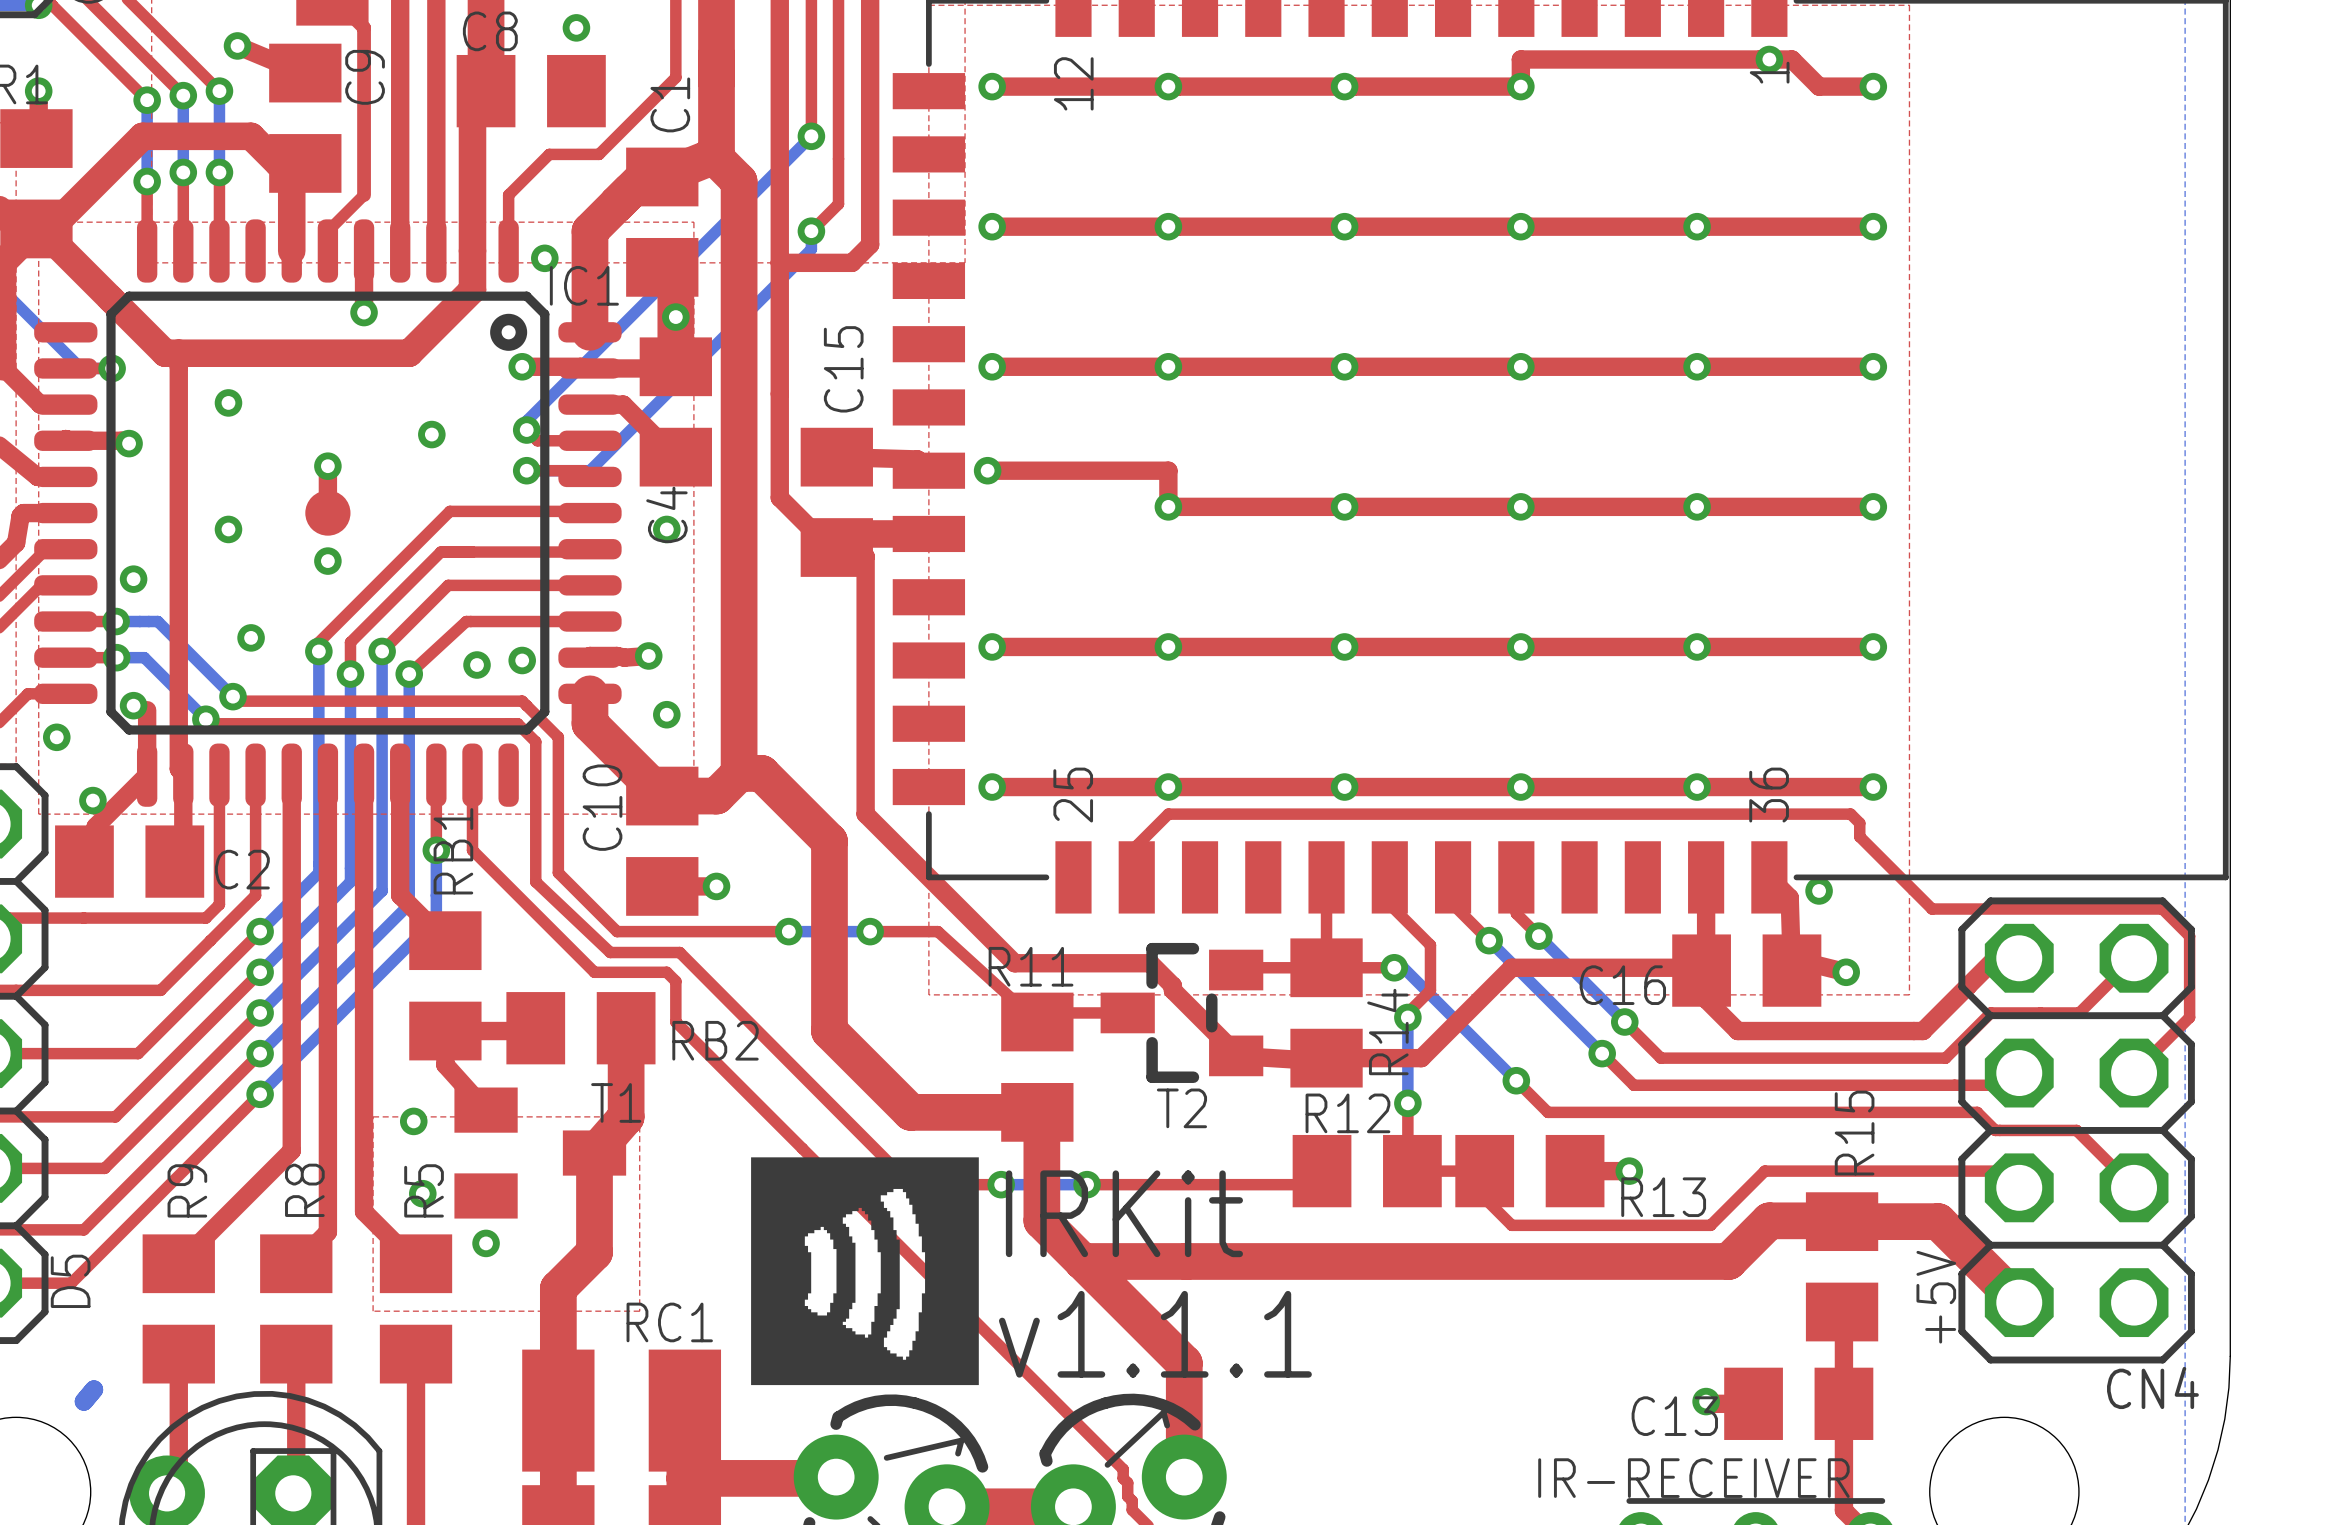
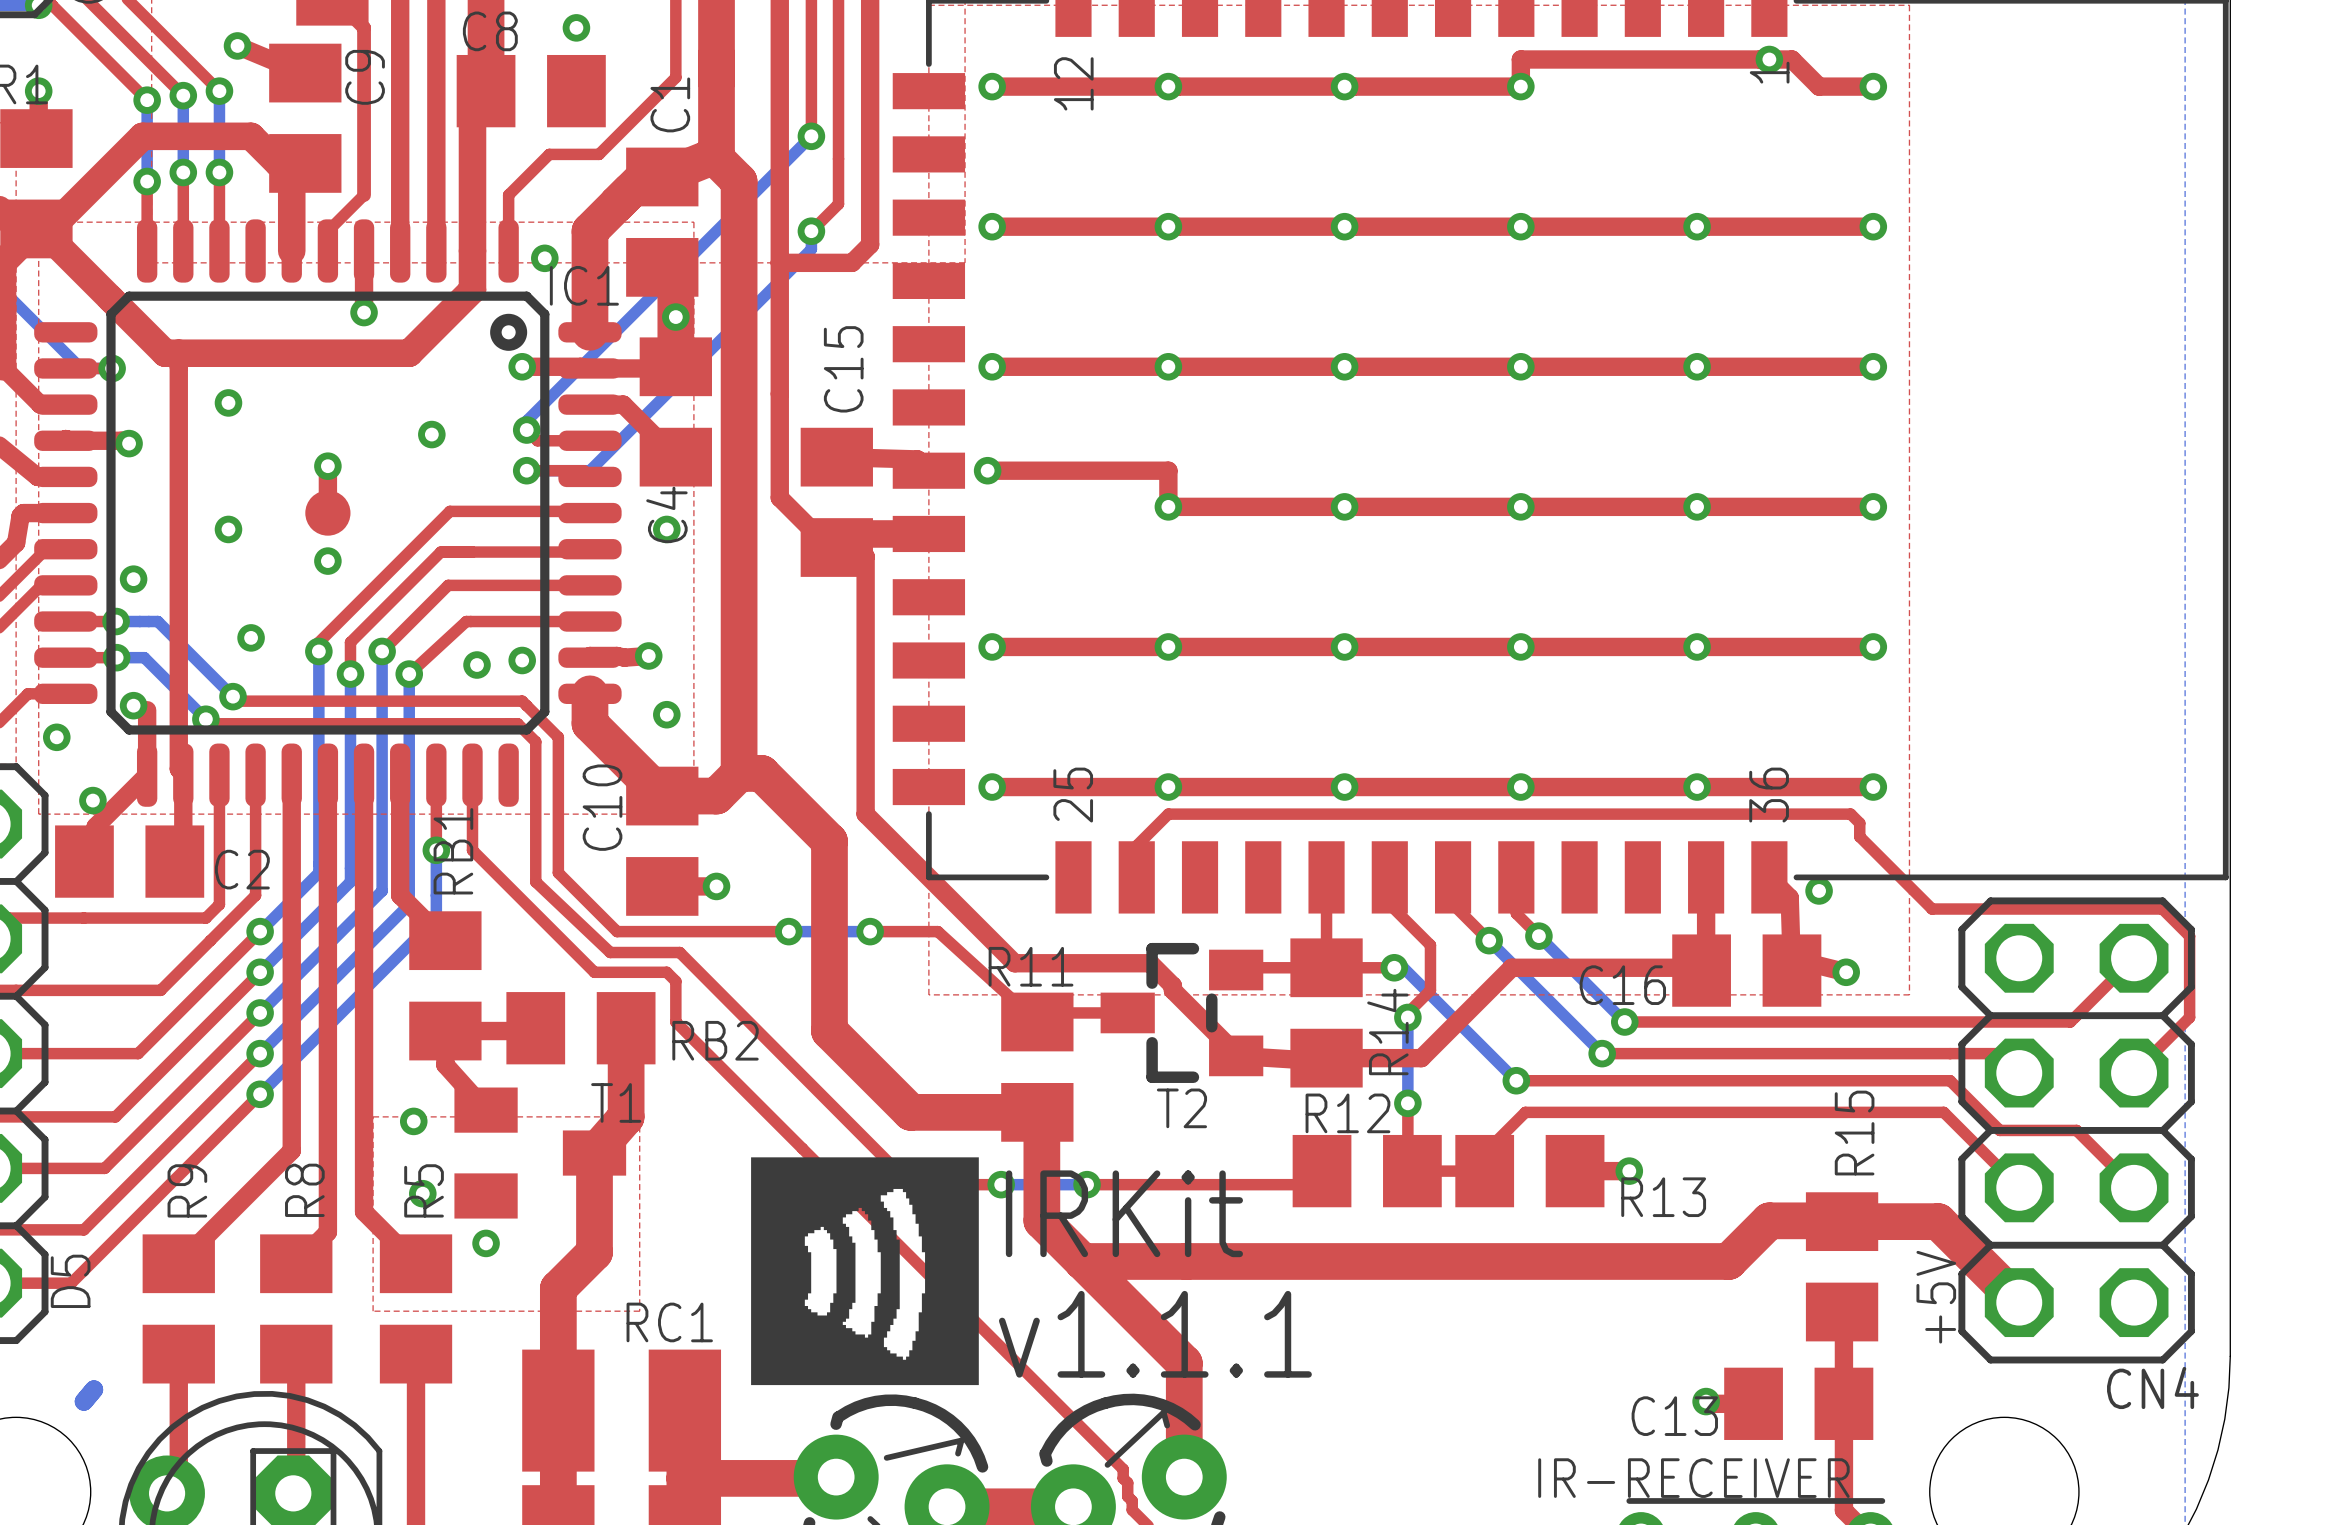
top track: (2019, 958) (1995, 958) (1923, 1031) (1737, 1031) (1706, 999) (1706, 975) (1701, 970) (1701, 958) (1706, 958) -> none
top track: (2079, 1012) (1990, 1012) (1945, 1058) (1660, 1058) (1624, 1021) -> (2079, 1012) (2070, 1021) (1624, 1021)
top track: (1602, 1053) (1633, 1085) (2007, 1085) (2019, 1073) -> (1602, 1053) (1999, 1053) (2019, 1073)
top track: (1516, 1080) (1547, 1112) -> (1484, 1171) (1484, 1153) (1525, 1112) (1547, 1112)
top track: none -> (1516, 1080) (1950, 1080) (1999, 1130)
top track: (1943, 1112) (1977, 1112) (1995, 1130) (1999, 1130) -> (1943, 1112) (2002, 1171)
top track: (1484, 1171) (1484, 1198) (1511, 1225) (1710, 1225) (1764, 1171) (2002, 1171) -> none

